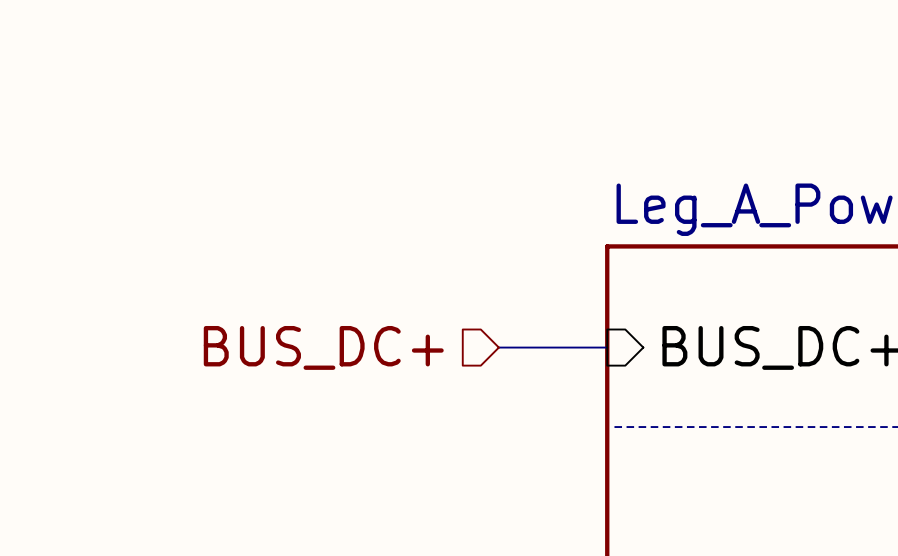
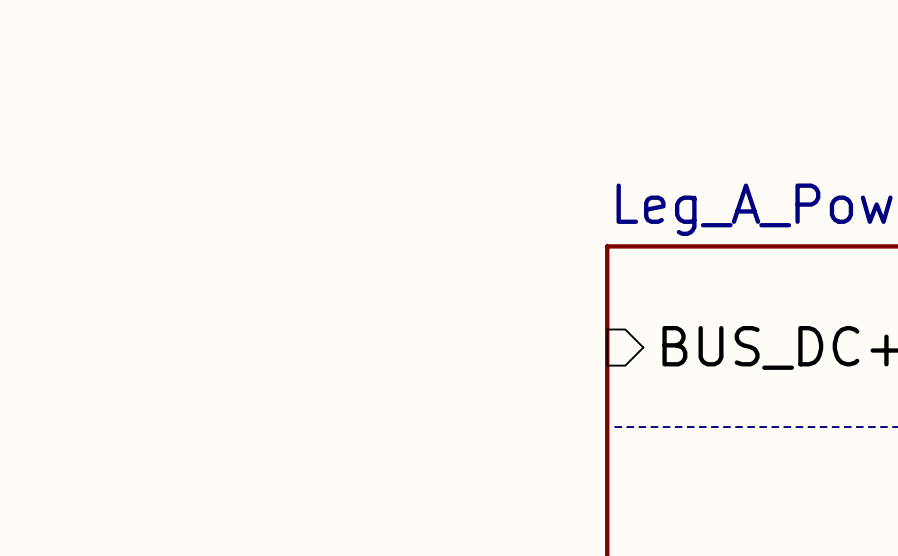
hierarchical label: BUS_DC+ (323, 347) -> none
wire: (498, 347) (607, 347) -> none

